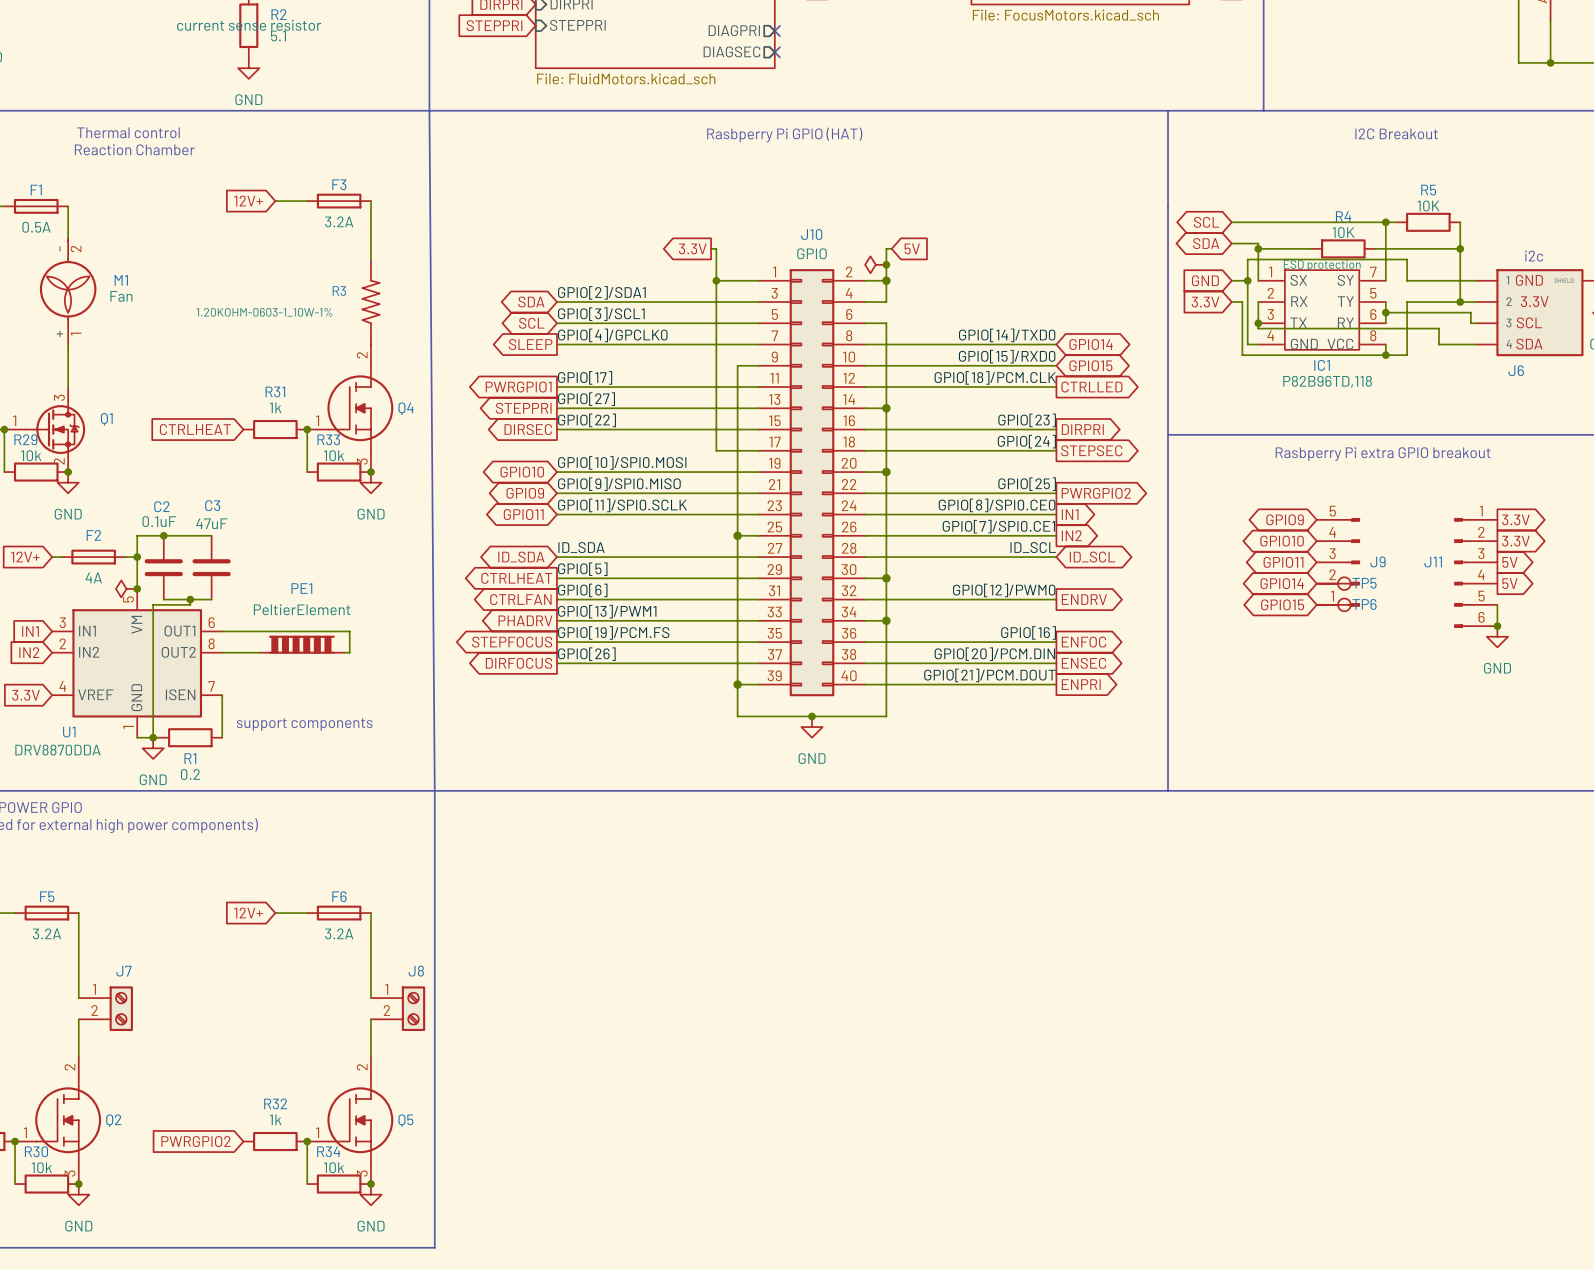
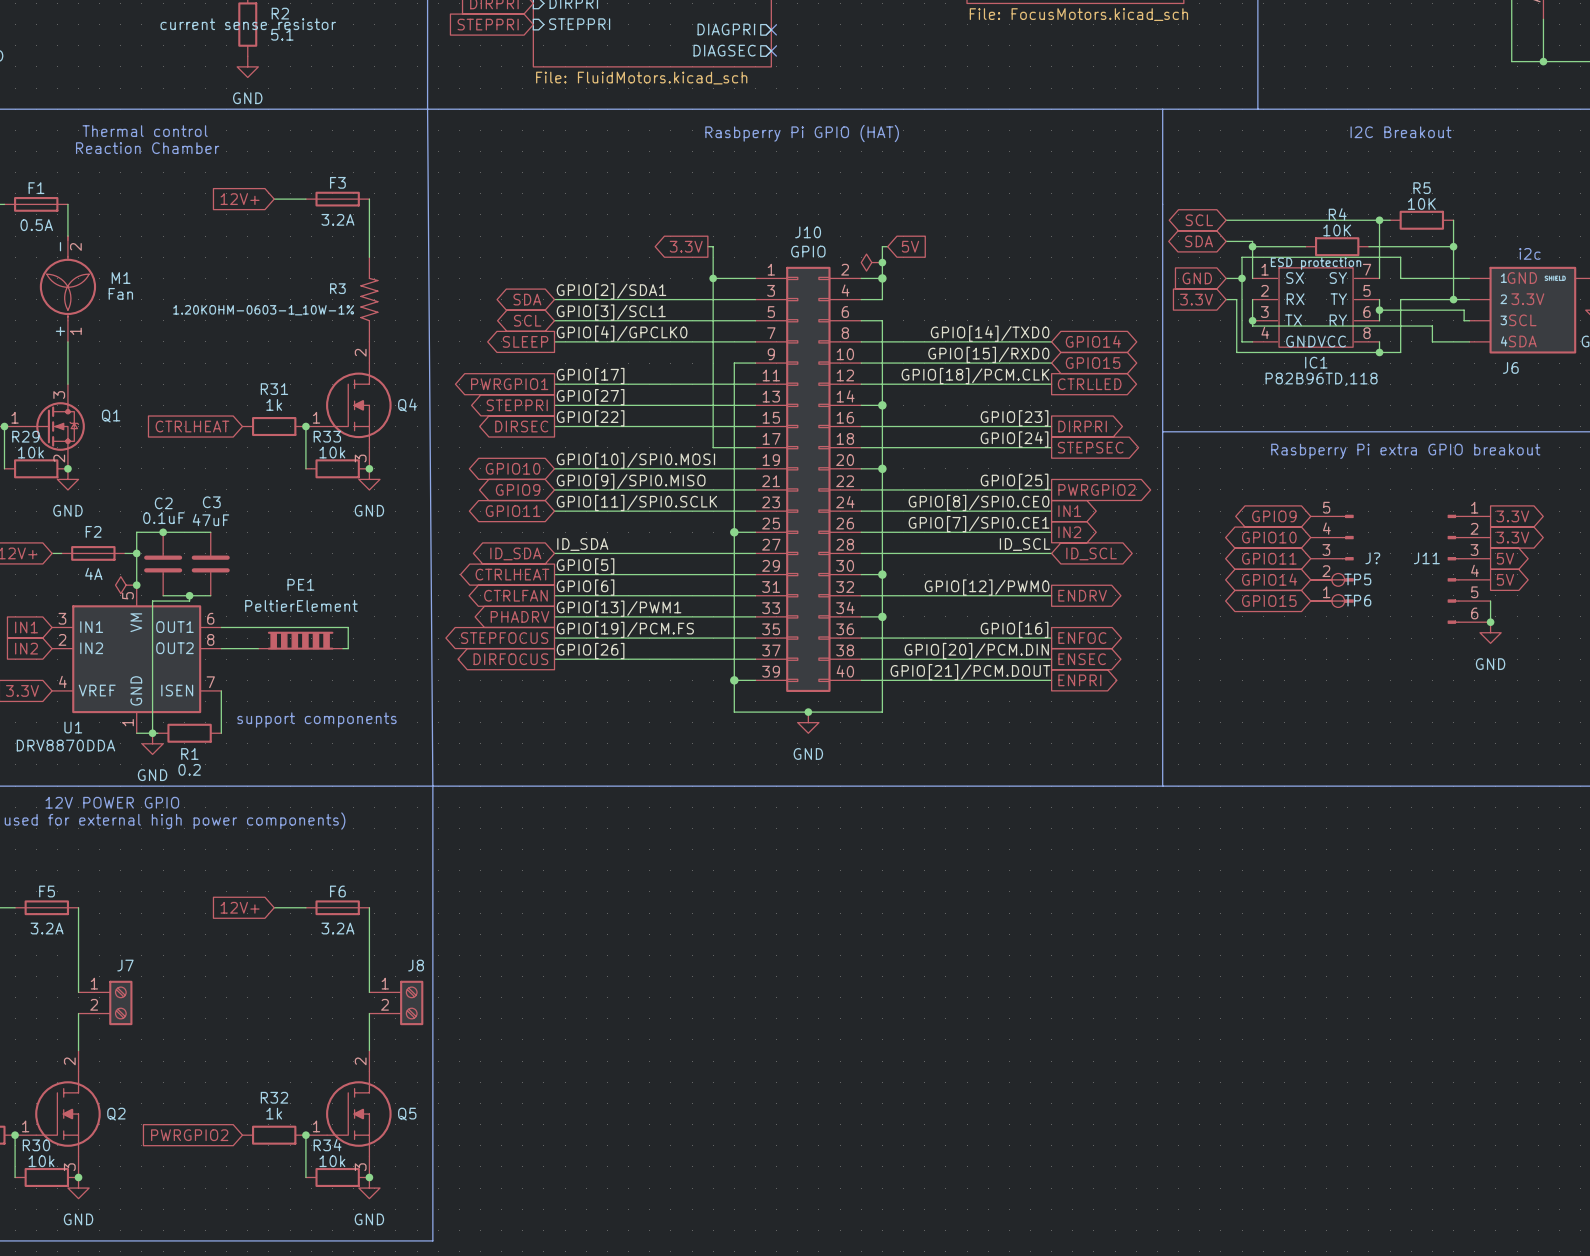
J9 name: J9 (1377, 561) -> J? (1372, 558)

